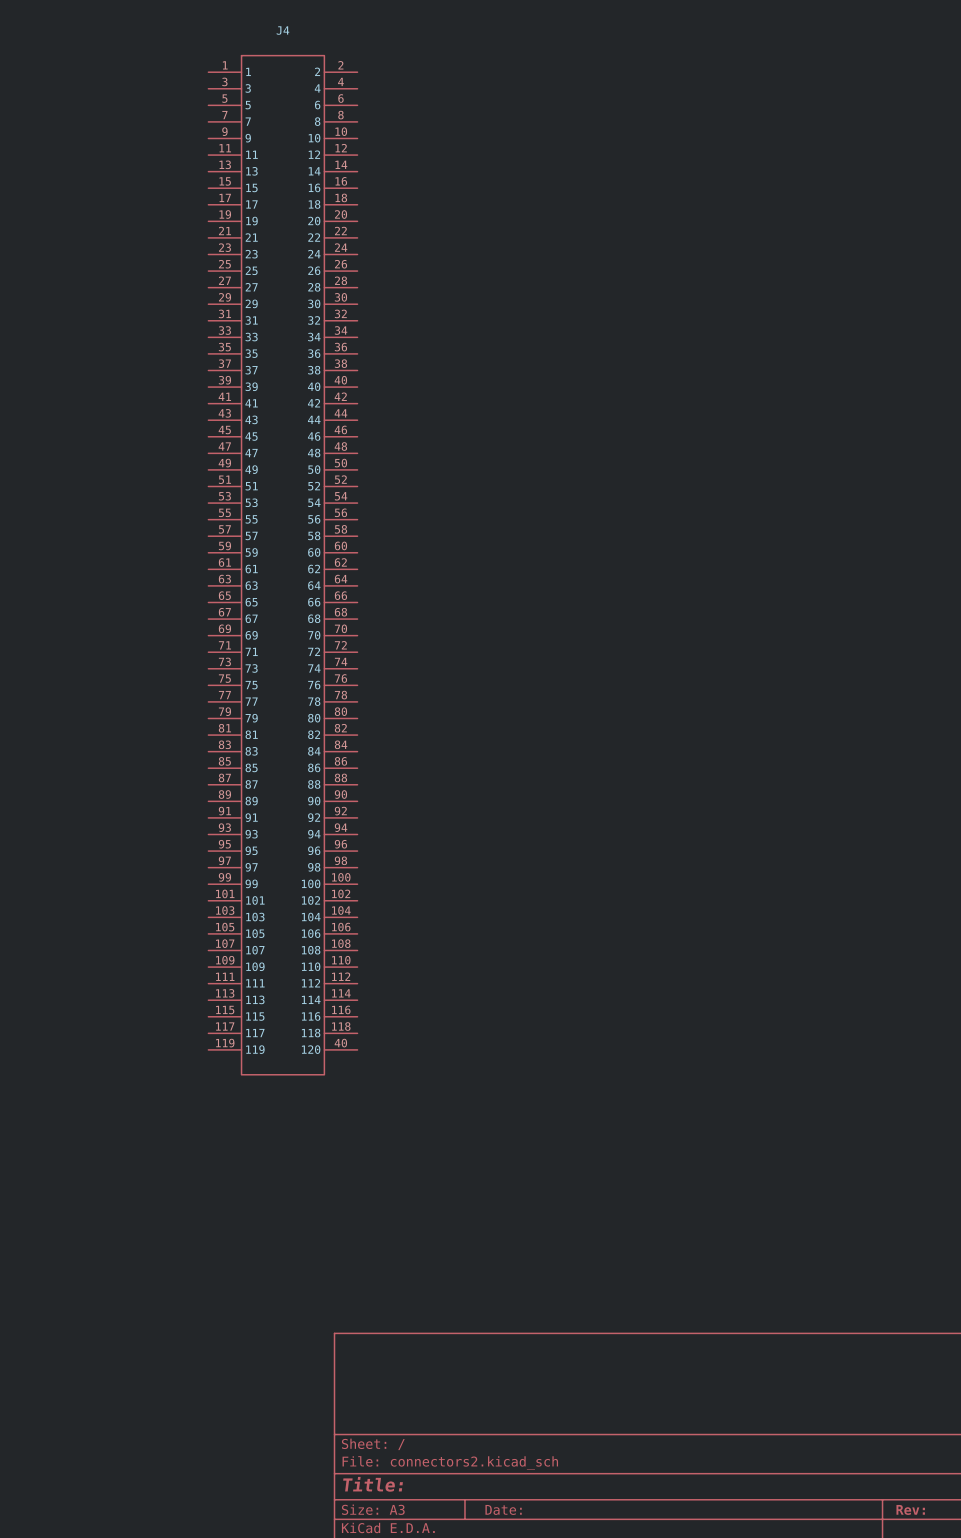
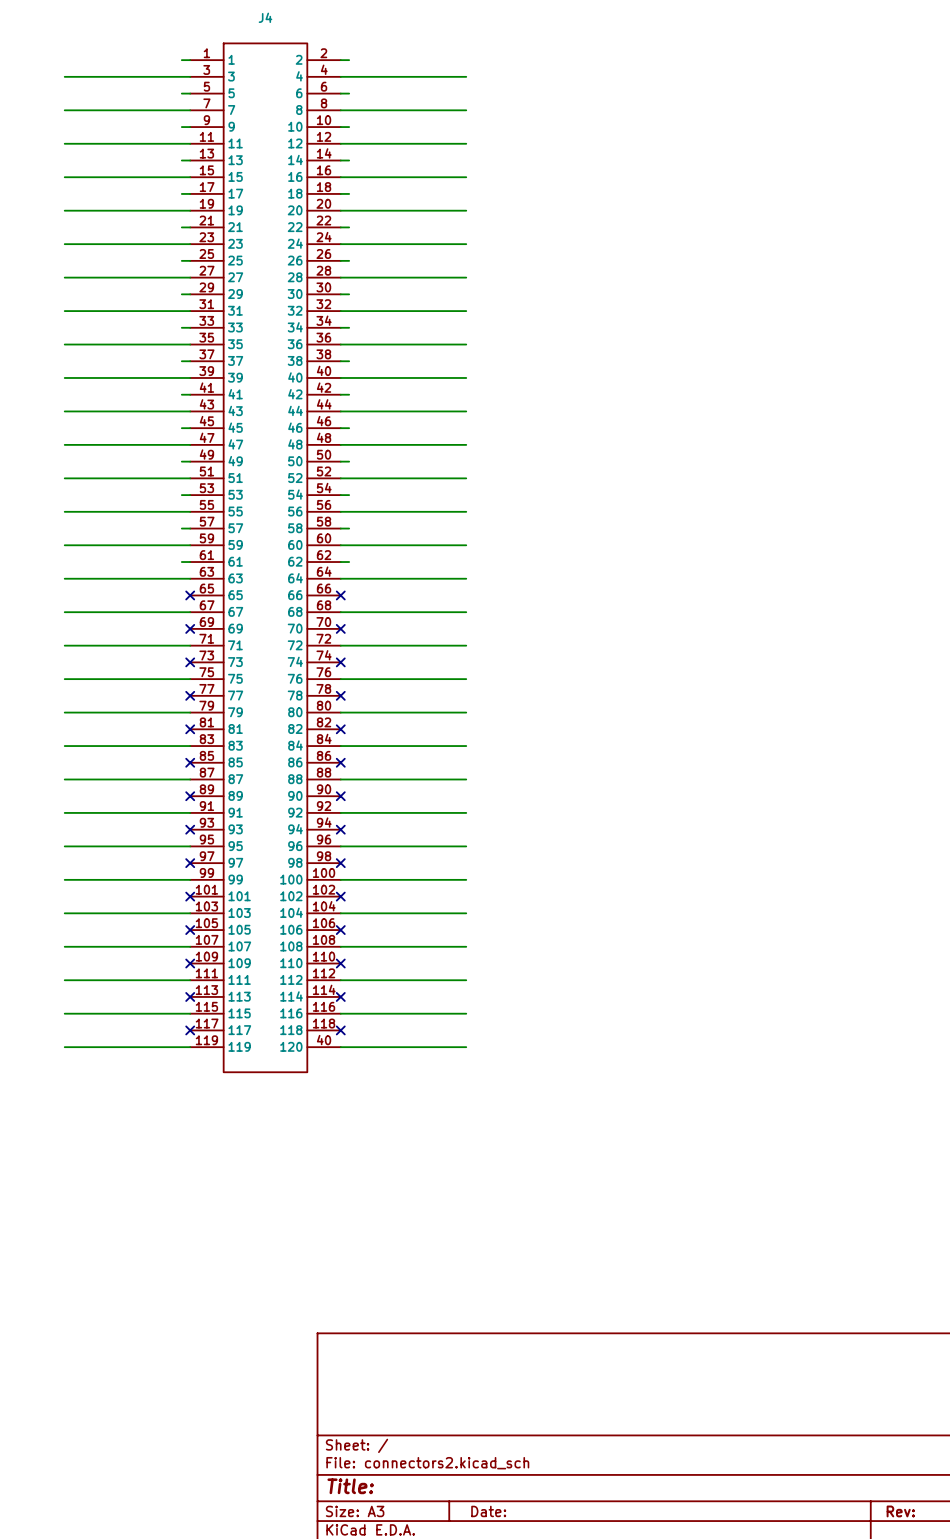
wire: none -> (181, 60) (190, 60)
wire: none -> (340, 60) (349, 60)
wire: none -> (64, 76) (190, 76)
wire: none -> (340, 76) (466, 76)
wire: none -> (181, 93) (190, 93)
wire: none -> (340, 93) (349, 93)
wire: none -> (64, 110) (190, 110)
wire: none -> (340, 110) (466, 110)
wire: none -> (181, 127) (190, 127)
wire: none -> (340, 127) (349, 127)
wire: none -> (64, 143) (190, 143)
wire: none -> (340, 143) (466, 143)
wire: none -> (181, 160) (190, 160)
wire: none -> (340, 160) (349, 160)
wire: none -> (64, 177) (190, 177)
wire: none -> (340, 177) (466, 177)
wire: none -> (181, 193) (190, 193)
wire: none -> (340, 193) (349, 193)
wire: none -> (64, 210) (190, 210)
wire: none -> (340, 210) (466, 210)
wire: none -> (181, 227) (190, 227)
wire: none -> (340, 227) (349, 227)
wire: none -> (64, 244) (190, 244)
wire: none -> (340, 244) (466, 244)
wire: none -> (181, 260) (190, 260)
wire: none -> (340, 260) (349, 260)
wire: none -> (64, 277) (190, 277)
wire: none -> (340, 277) (466, 277)
wire: none -> (181, 294) (190, 294)
wire: none -> (340, 294) (349, 294)
wire: none -> (64, 311) (190, 311)
wire: none -> (340, 311) (466, 311)
wire: none -> (181, 327) (190, 327)
wire: none -> (340, 327) (349, 327)
wire: none -> (64, 344) (190, 344)
wire: none -> (340, 344) (466, 344)
wire: none -> (181, 361) (190, 361)
wire: none -> (340, 361) (349, 361)
wire: none -> (64, 377) (190, 377)
wire: none -> (340, 377) (466, 377)
wire: none -> (181, 394) (190, 394)
wire: none -> (340, 394) (349, 394)
wire: none -> (64, 411) (190, 411)
wire: none -> (340, 411) (466, 411)
wire: none -> (181, 428) (190, 428)
wire: none -> (340, 428) (349, 428)
wire: none -> (64, 444) (190, 444)
wire: none -> (340, 444) (466, 444)
wire: none -> (181, 461) (190, 461)
wire: none -> (340, 461) (349, 461)
wire: none -> (64, 478) (190, 478)
wire: none -> (340, 478) (466, 478)
wire: none -> (181, 495) (190, 495)
wire: none -> (340, 495) (349, 495)
wire: none -> (64, 511) (190, 511)
wire: none -> (340, 511) (466, 511)
wire: none -> (181, 528) (190, 528)
wire: none -> (340, 528) (349, 528)
wire: none -> (64, 545) (190, 545)
wire: none -> (340, 545) (466, 545)
wire: none -> (181, 562) (190, 562)
wire: none -> (340, 562) (349, 562)
wire: none -> (64, 578) (190, 578)
wire: none -> (340, 578) (466, 578)
no-connect mark: none -> (190, 595)
no-connect mark: none -> (340, 595)
wire: none -> (64, 612) (190, 612)
wire: none -> (340, 612) (466, 612)
no-connect mark: none -> (190, 628)
no-connect mark: none -> (340, 628)
wire: none -> (64, 645) (190, 645)
wire: none -> (340, 645) (466, 645)
no-connect mark: none -> (190, 662)
no-connect mark: none -> (340, 662)
wire: none -> (64, 679) (190, 679)
wire: none -> (340, 679) (466, 679)
no-connect mark: none -> (190, 695)
no-connect mark: none -> (340, 695)
wire: none -> (64, 712) (190, 712)
wire: none -> (340, 712) (466, 712)
no-connect mark: none -> (190, 729)
no-connect mark: none -> (340, 729)
wire: none -> (64, 746) (190, 746)
wire: none -> (340, 746) (466, 746)
no-connect mark: none -> (190, 762)
no-connect mark: none -> (340, 762)
wire: none -> (64, 779) (190, 779)
wire: none -> (340, 779) (466, 779)
no-connect mark: none -> (190, 796)
no-connect mark: none -> (340, 796)
wire: none -> (64, 812) (190, 812)
wire: none -> (340, 812) (466, 812)
no-connect mark: none -> (190, 829)
no-connect mark: none -> (340, 829)
wire: none -> (64, 846) (190, 846)
wire: none -> (340, 846) (466, 846)
no-connect mark: none -> (190, 863)
no-connect mark: none -> (340, 863)
wire: none -> (64, 879) (190, 879)
wire: none -> (340, 879) (466, 879)
no-connect mark: none -> (190, 896)
no-connect mark: none -> (340, 896)
wire: none -> (64, 913) (190, 913)
wire: none -> (340, 913) (466, 913)
no-connect mark: none -> (190, 930)
no-connect mark: none -> (340, 930)
wire: none -> (64, 946) (190, 946)
wire: none -> (340, 946) (466, 946)
no-connect mark: none -> (190, 963)
no-connect mark: none -> (340, 963)
wire: none -> (64, 980) (190, 980)
wire: none -> (340, 980) (466, 980)
no-connect mark: none -> (190, 996)
no-connect mark: none -> (340, 996)
wire: none -> (64, 1013) (190, 1013)
wire: none -> (340, 1013) (466, 1013)
no-connect mark: none -> (190, 1030)
no-connect mark: none -> (340, 1030)
wire: none -> (64, 1047) (190, 1047)
wire: none -> (340, 1047) (466, 1047)

